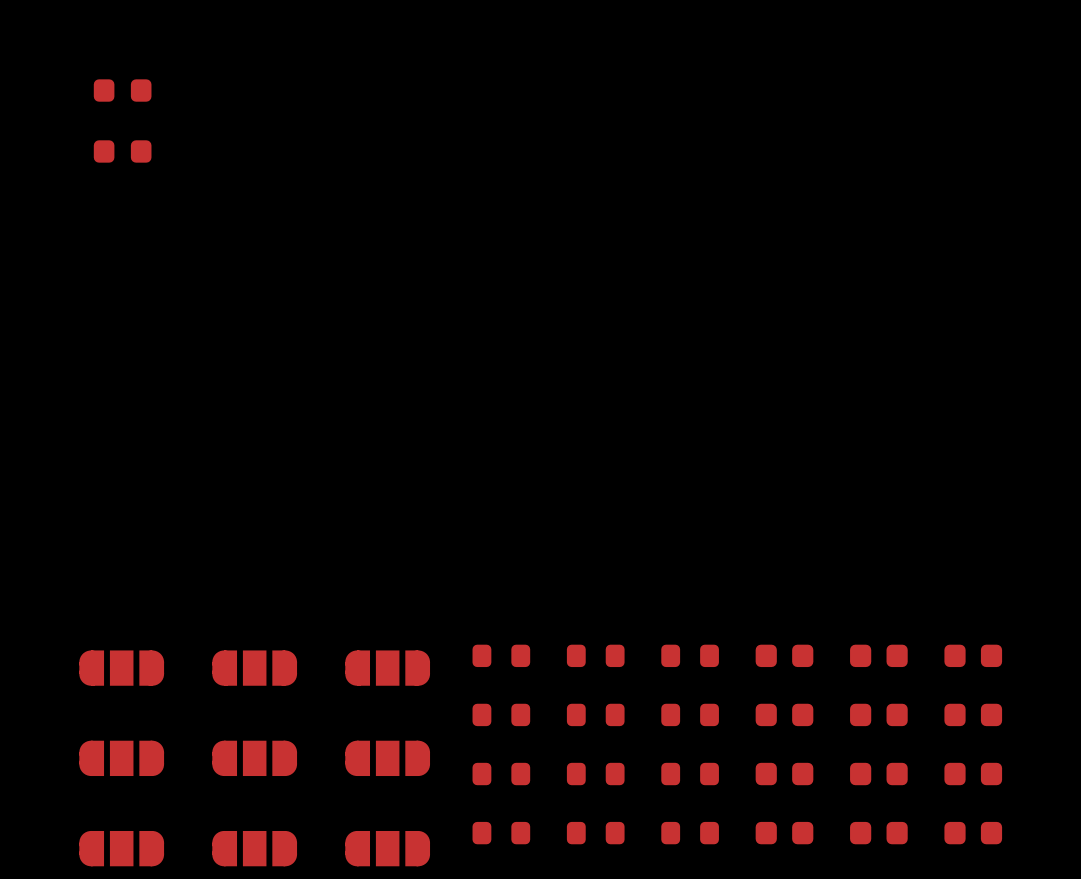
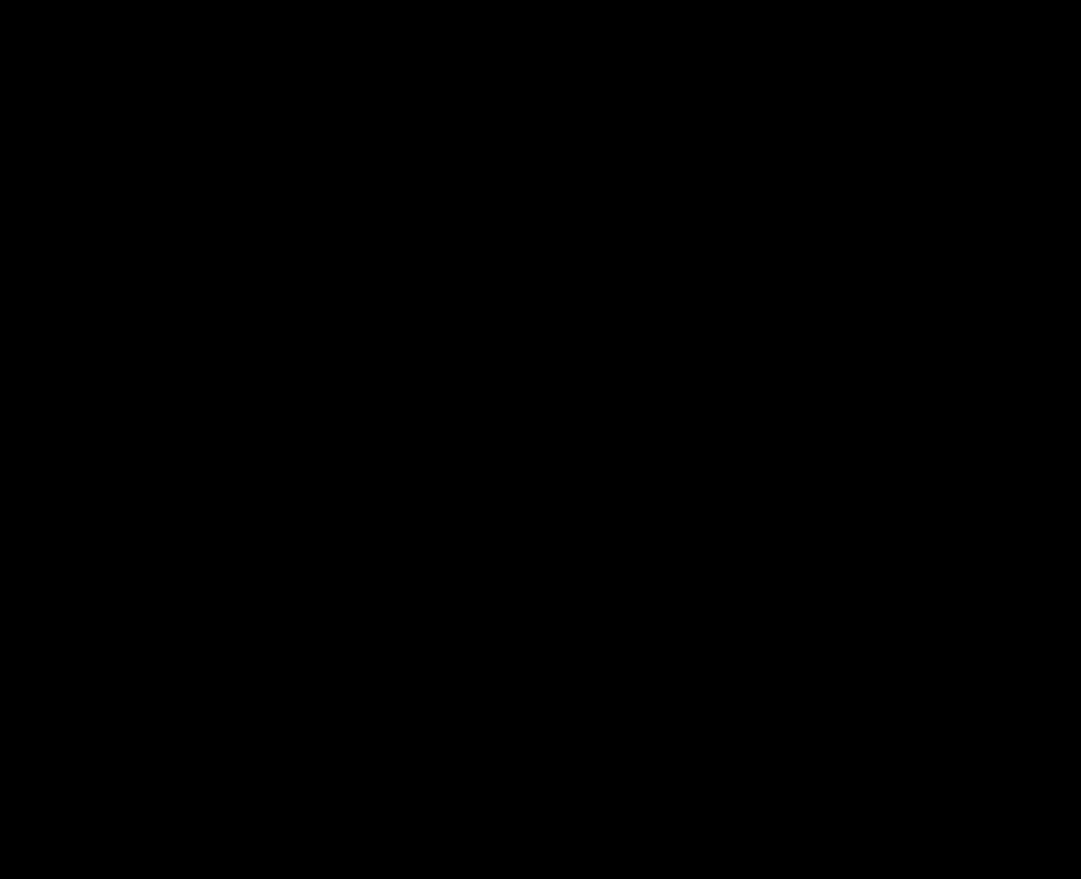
part: (122, 90) -> none
part: (122, 151) -> none
part: (501, 655) -> none
part: (595, 655) -> none
part: (690, 655) -> none
part: (784, 655) -> none
part: (878, 655) -> none
part: (973, 655) -> none
part: (121, 668) -> none
part: (254, 668) -> none
part: (387, 668) -> none
part: (501, 714) -> none
part: (595, 714) -> none
part: (690, 714) -> none
part: (784, 714) -> none
part: (878, 714) -> none
part: (973, 714) -> none
part: (121, 758) -> none
part: (254, 758) -> none
part: (387, 758) -> none
part: (501, 774) -> none
part: (595, 774) -> none
part: (690, 774) -> none
part: (784, 774) -> none
part: (878, 774) -> none
part: (973, 774) -> none
part: (501, 833) -> none
part: (595, 833) -> none
part: (690, 833) -> none
part: (784, 833) -> none
part: (878, 833) -> none
part: (973, 833) -> none
part: (121, 848) -> none
part: (254, 848) -> none
part: (387, 848) -> none

